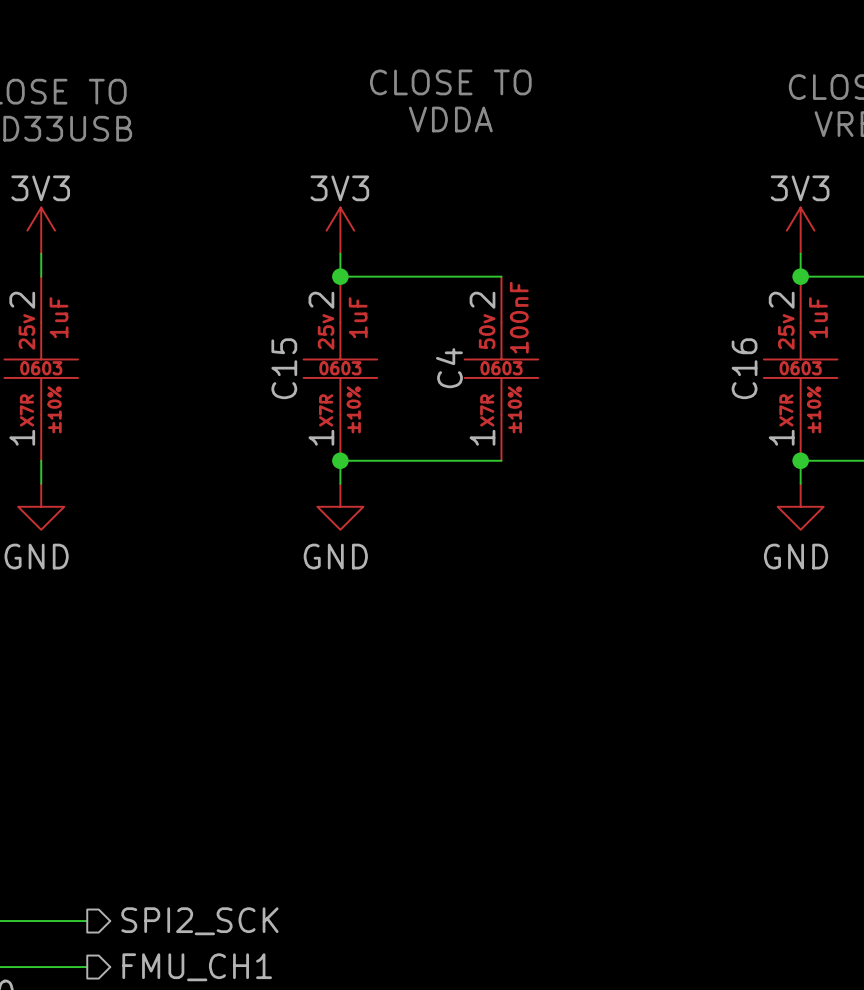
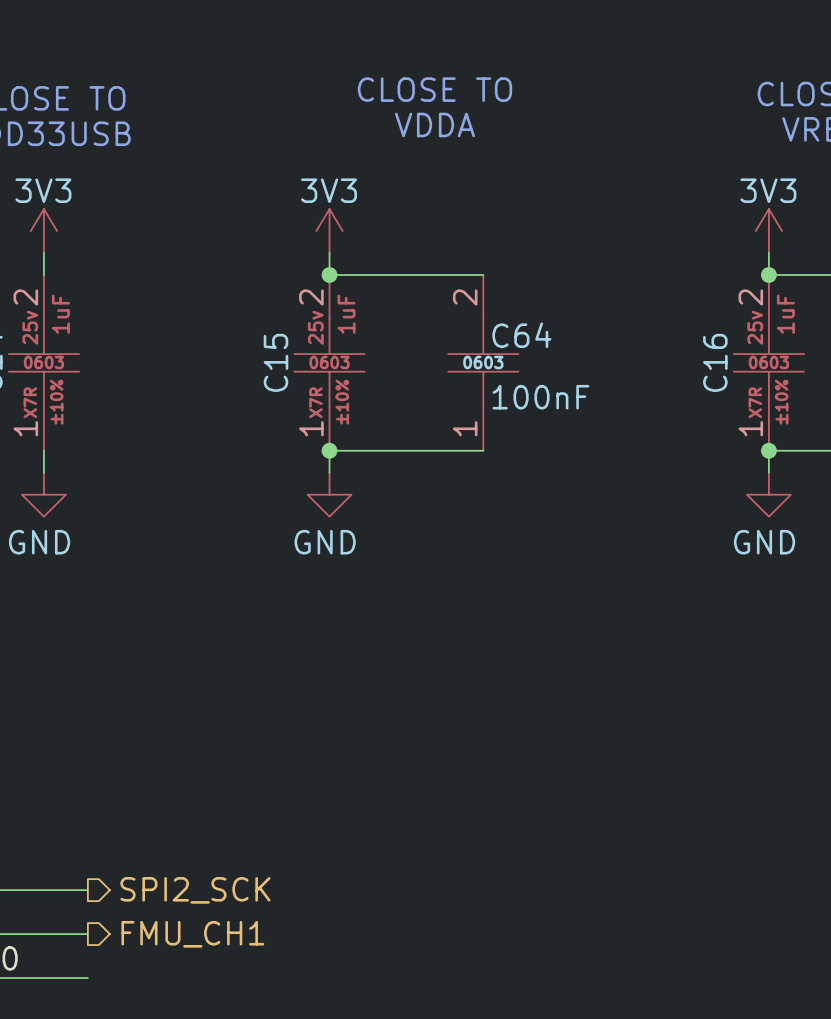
C4 text: 100nF (519, 317) -> none
C4 text: 50v (487, 331) -> none
C4 name: C4 (449, 368) -> C64 (521, 335)
C4 text: 0603 (501, 368) -> none
C4 text: none -> 0603 (483, 362)
C4 text: none -> 100nF (540, 397)
C4 text: ±10% (514, 409) -> none
C4 text: X7R (487, 410) -> none

